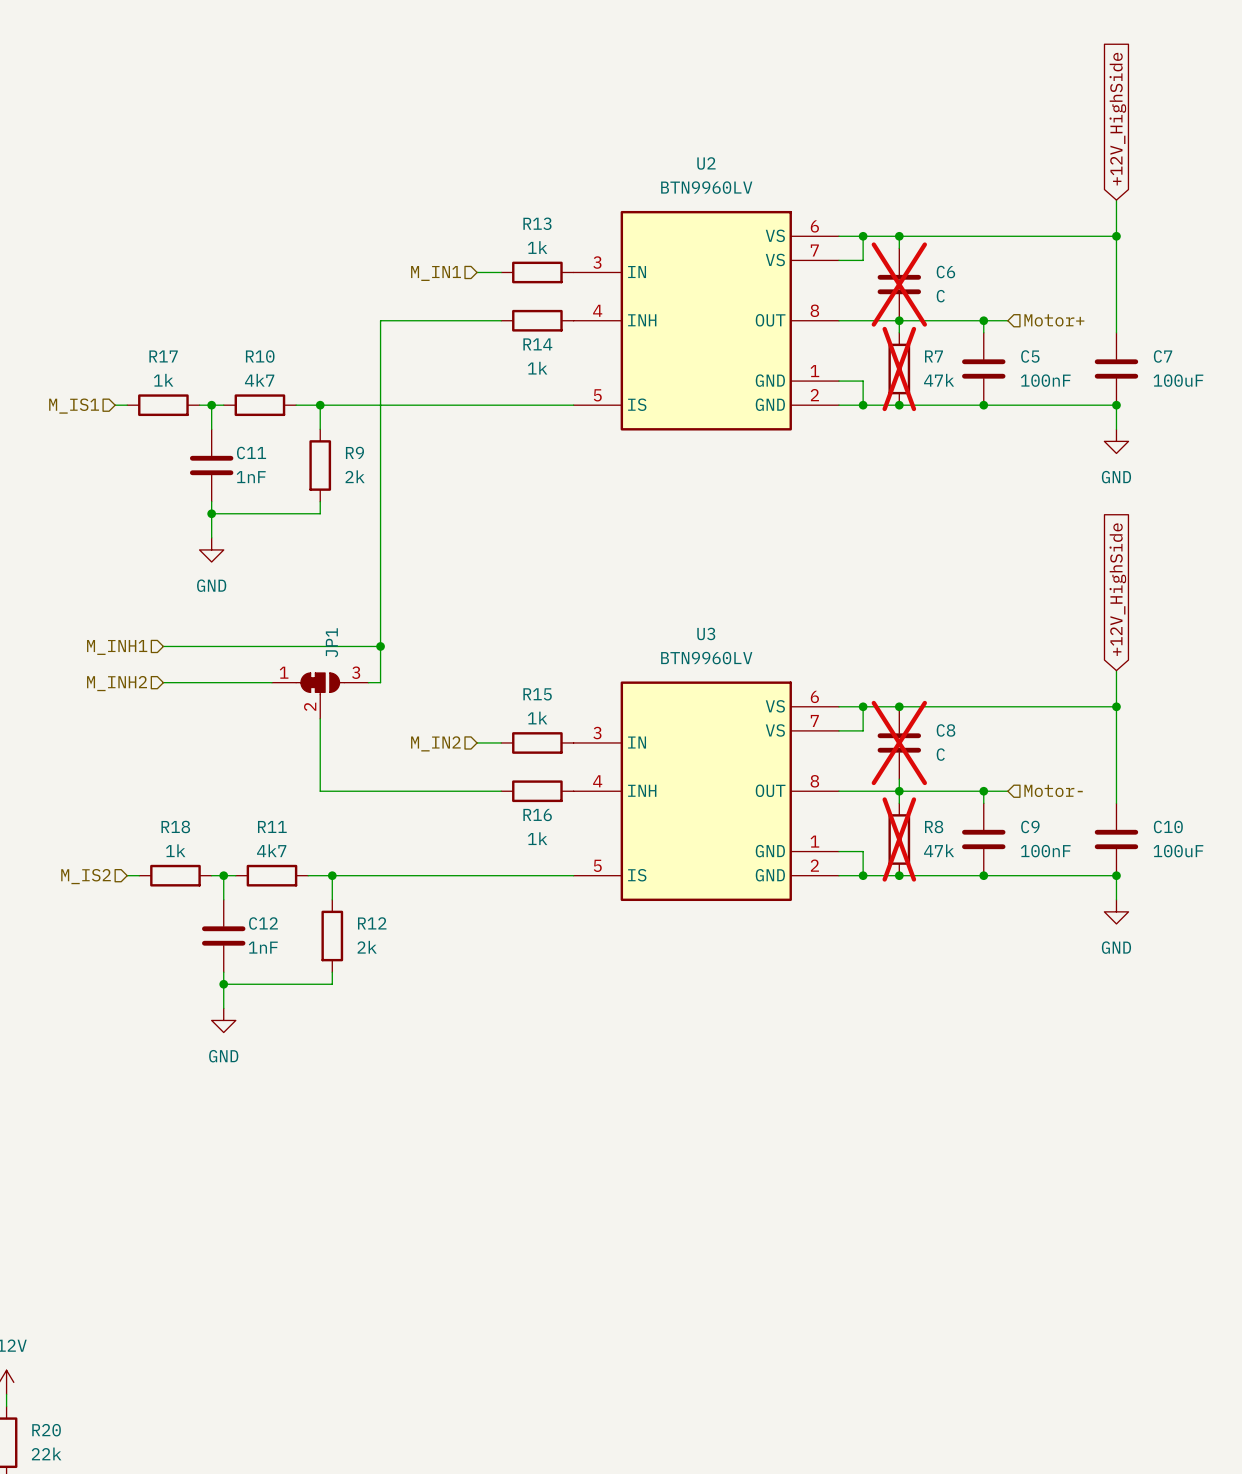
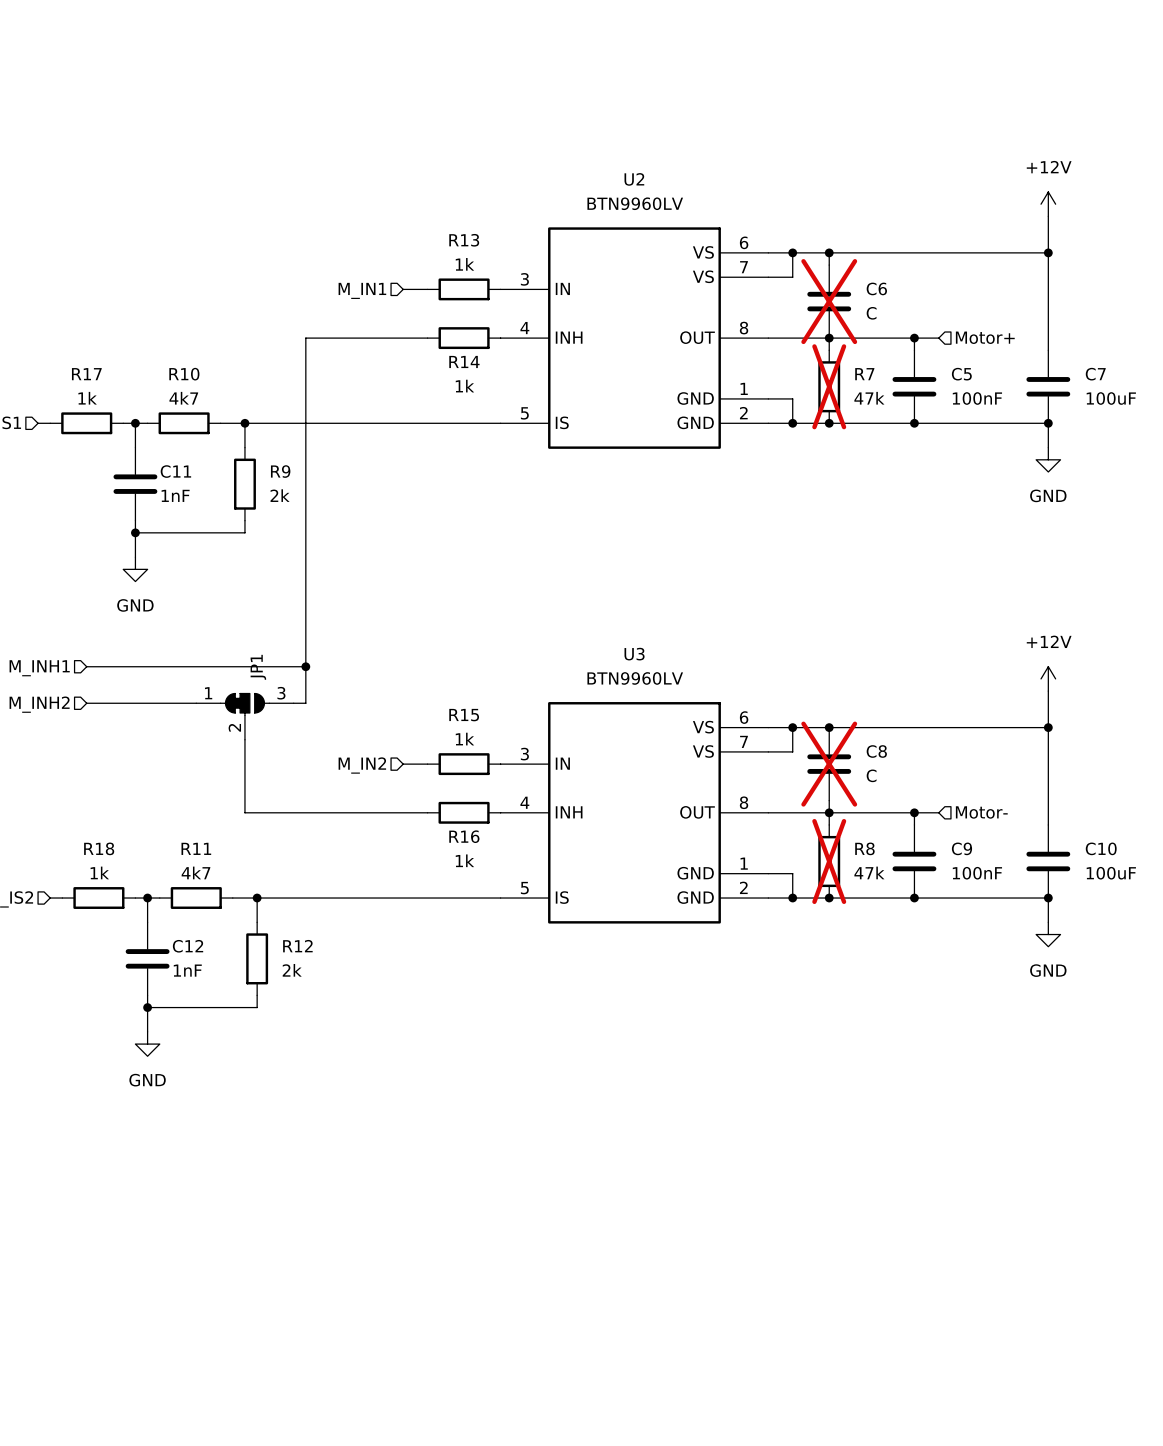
global label: +12V_HighSide (1117, 119) -> none
power symbol: none -> +12V (1048, 204)
global label: +12V_HighSide (1117, 589) -> none
power symbol: none -> +12V (1048, 678)

